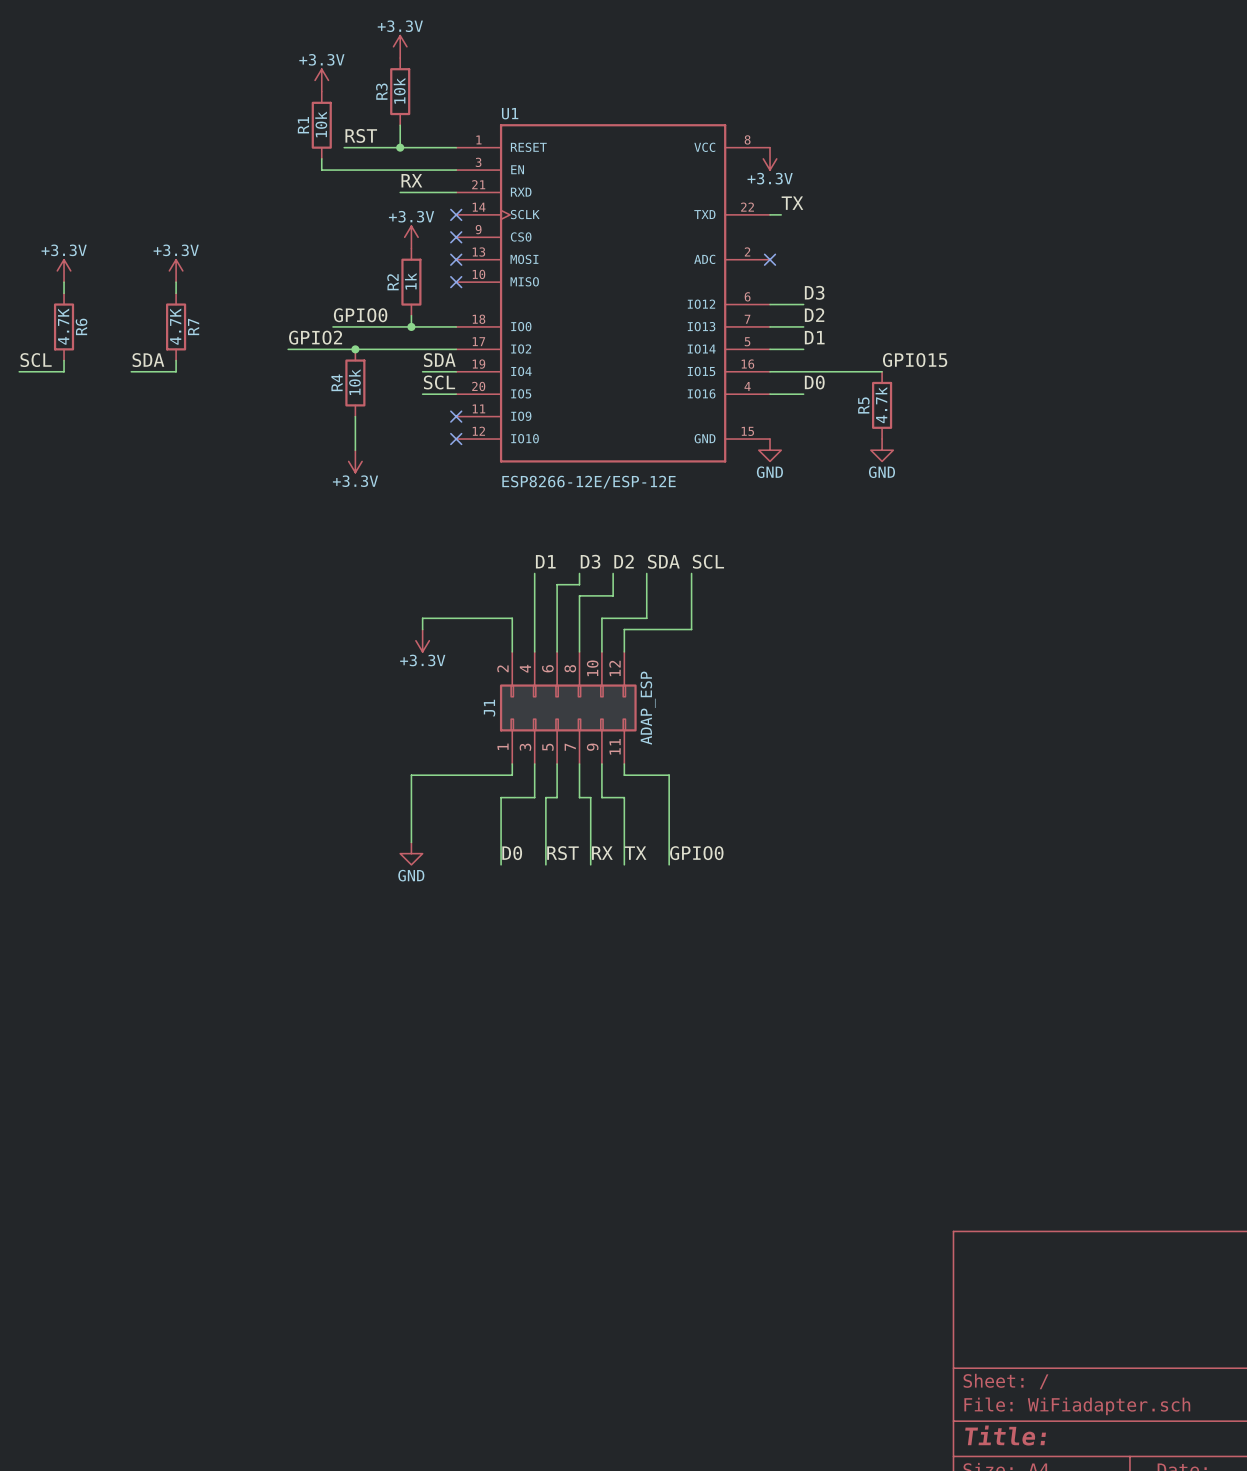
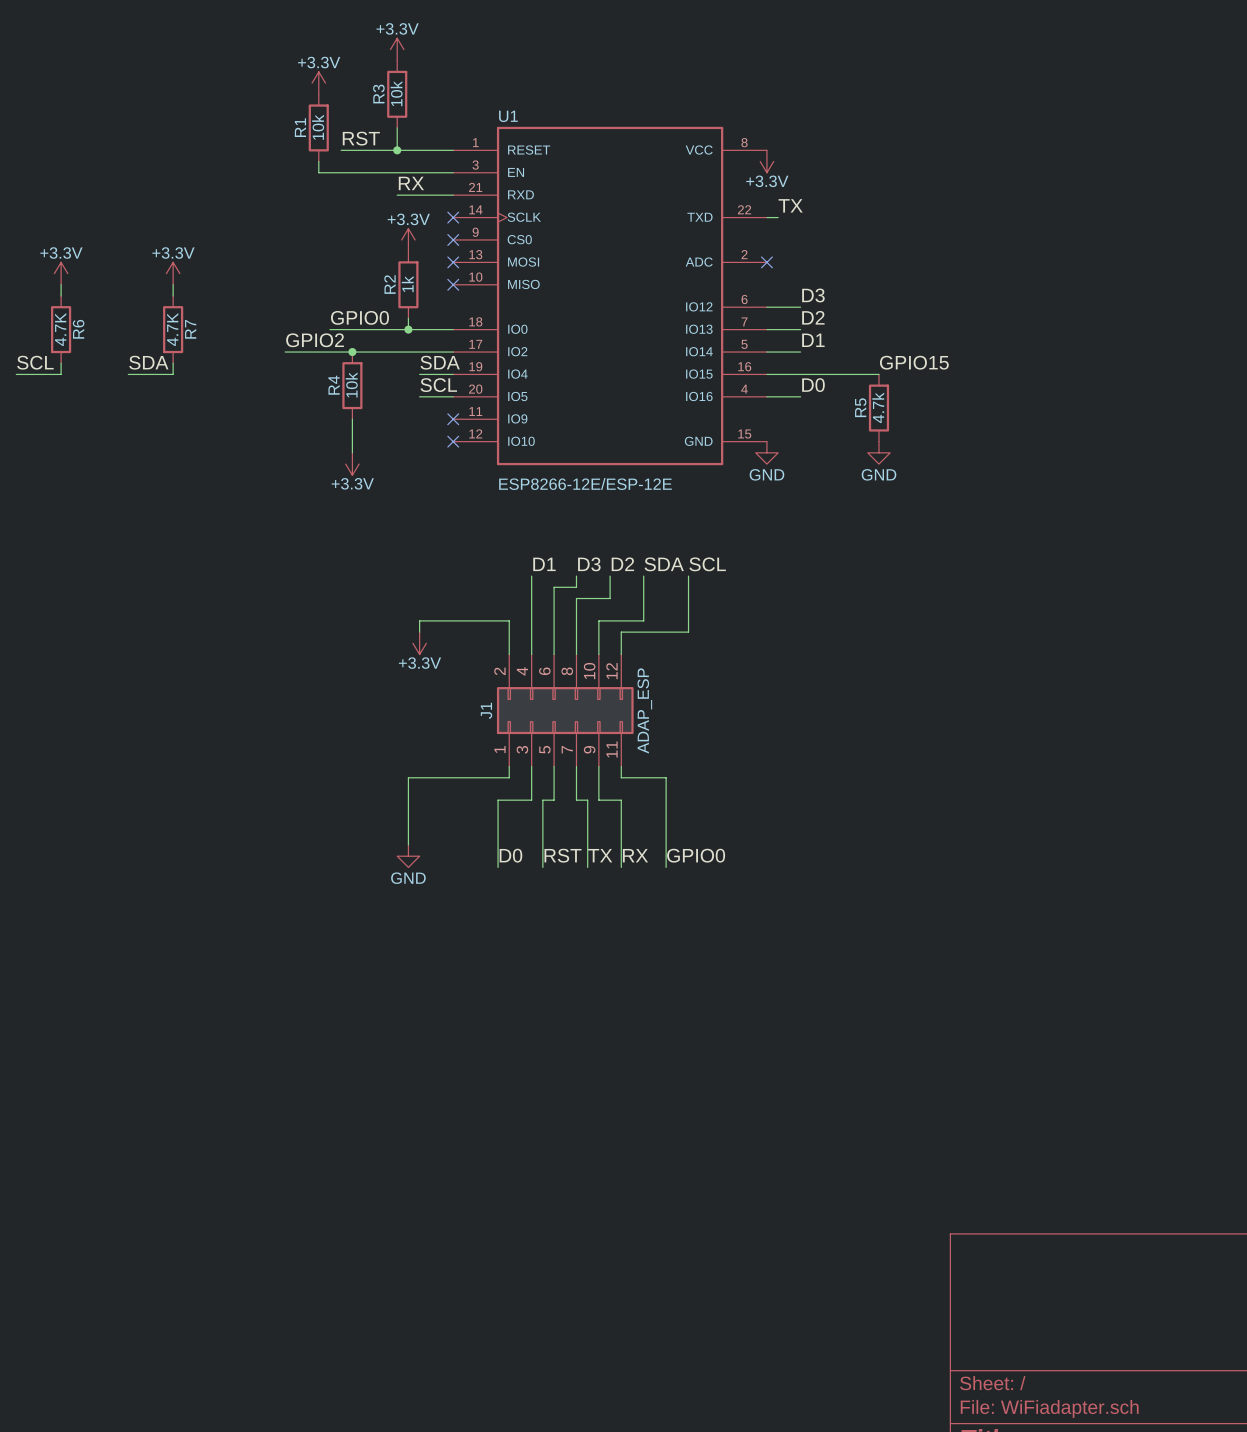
label: RX (602, 853) -> TX (600, 855)
label: TX (635, 853) -> RX (635, 855)

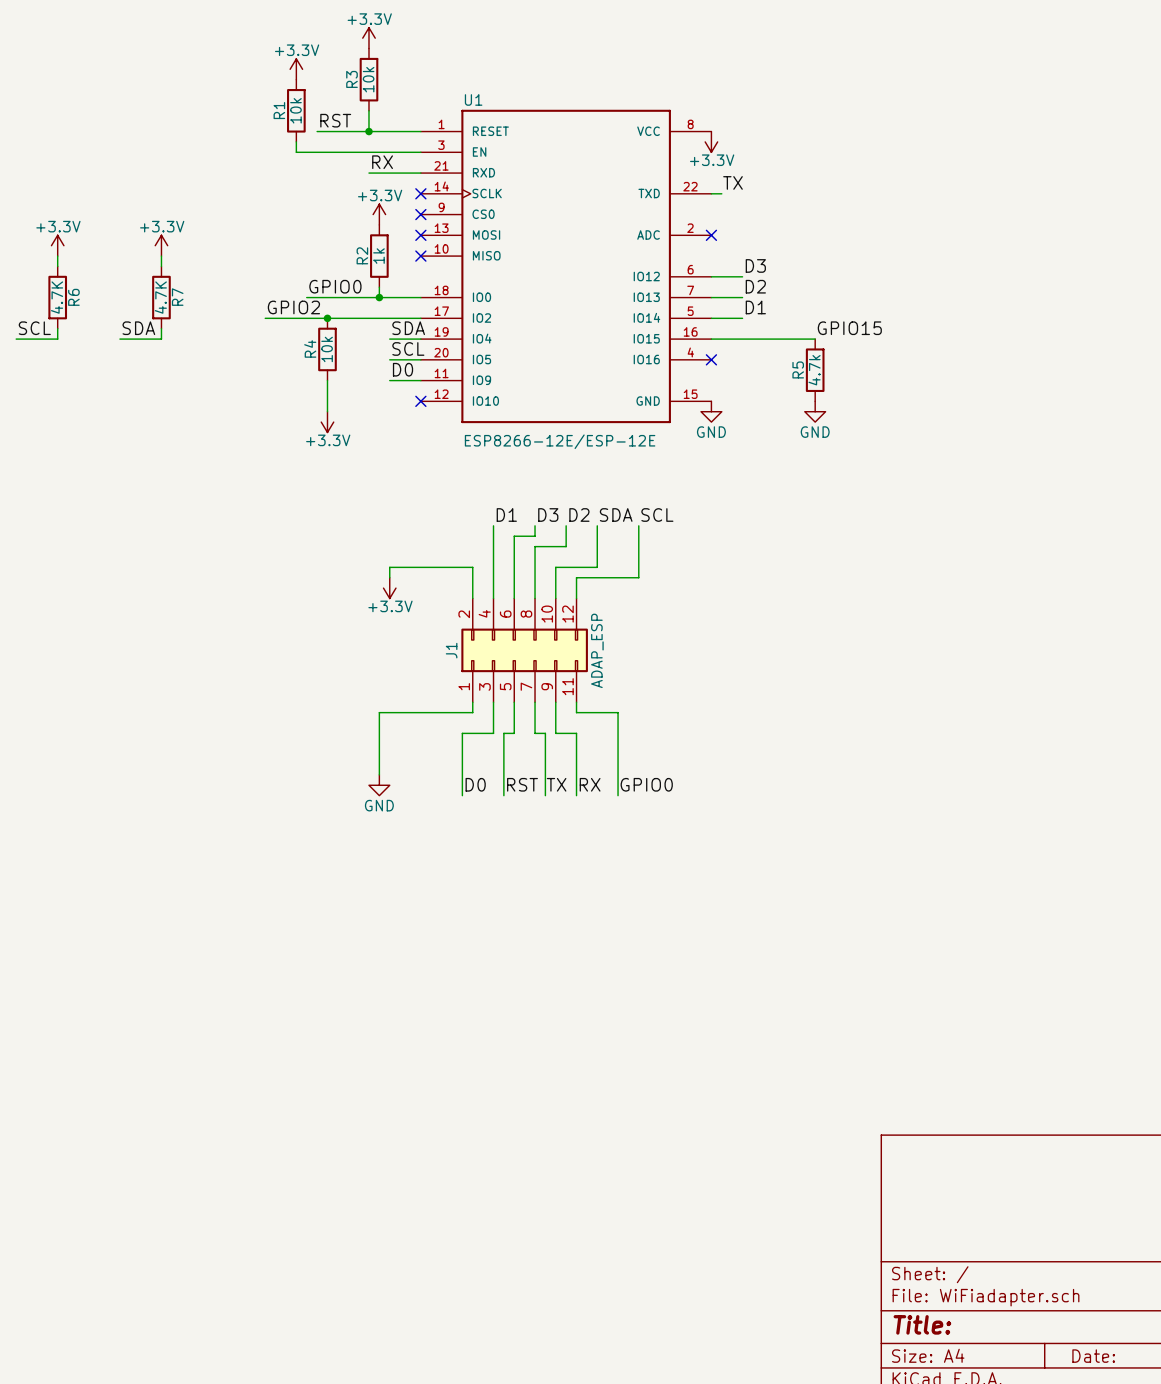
label: D0 (813, 385) -> none
wire: (766, 396) (800, 396) -> none
no-connect mark: none -> (711, 359)
label: none -> D0 (403, 369)
wire: none -> (389, 380) (420, 380)
no-connect mark: (453, 419) -> none

